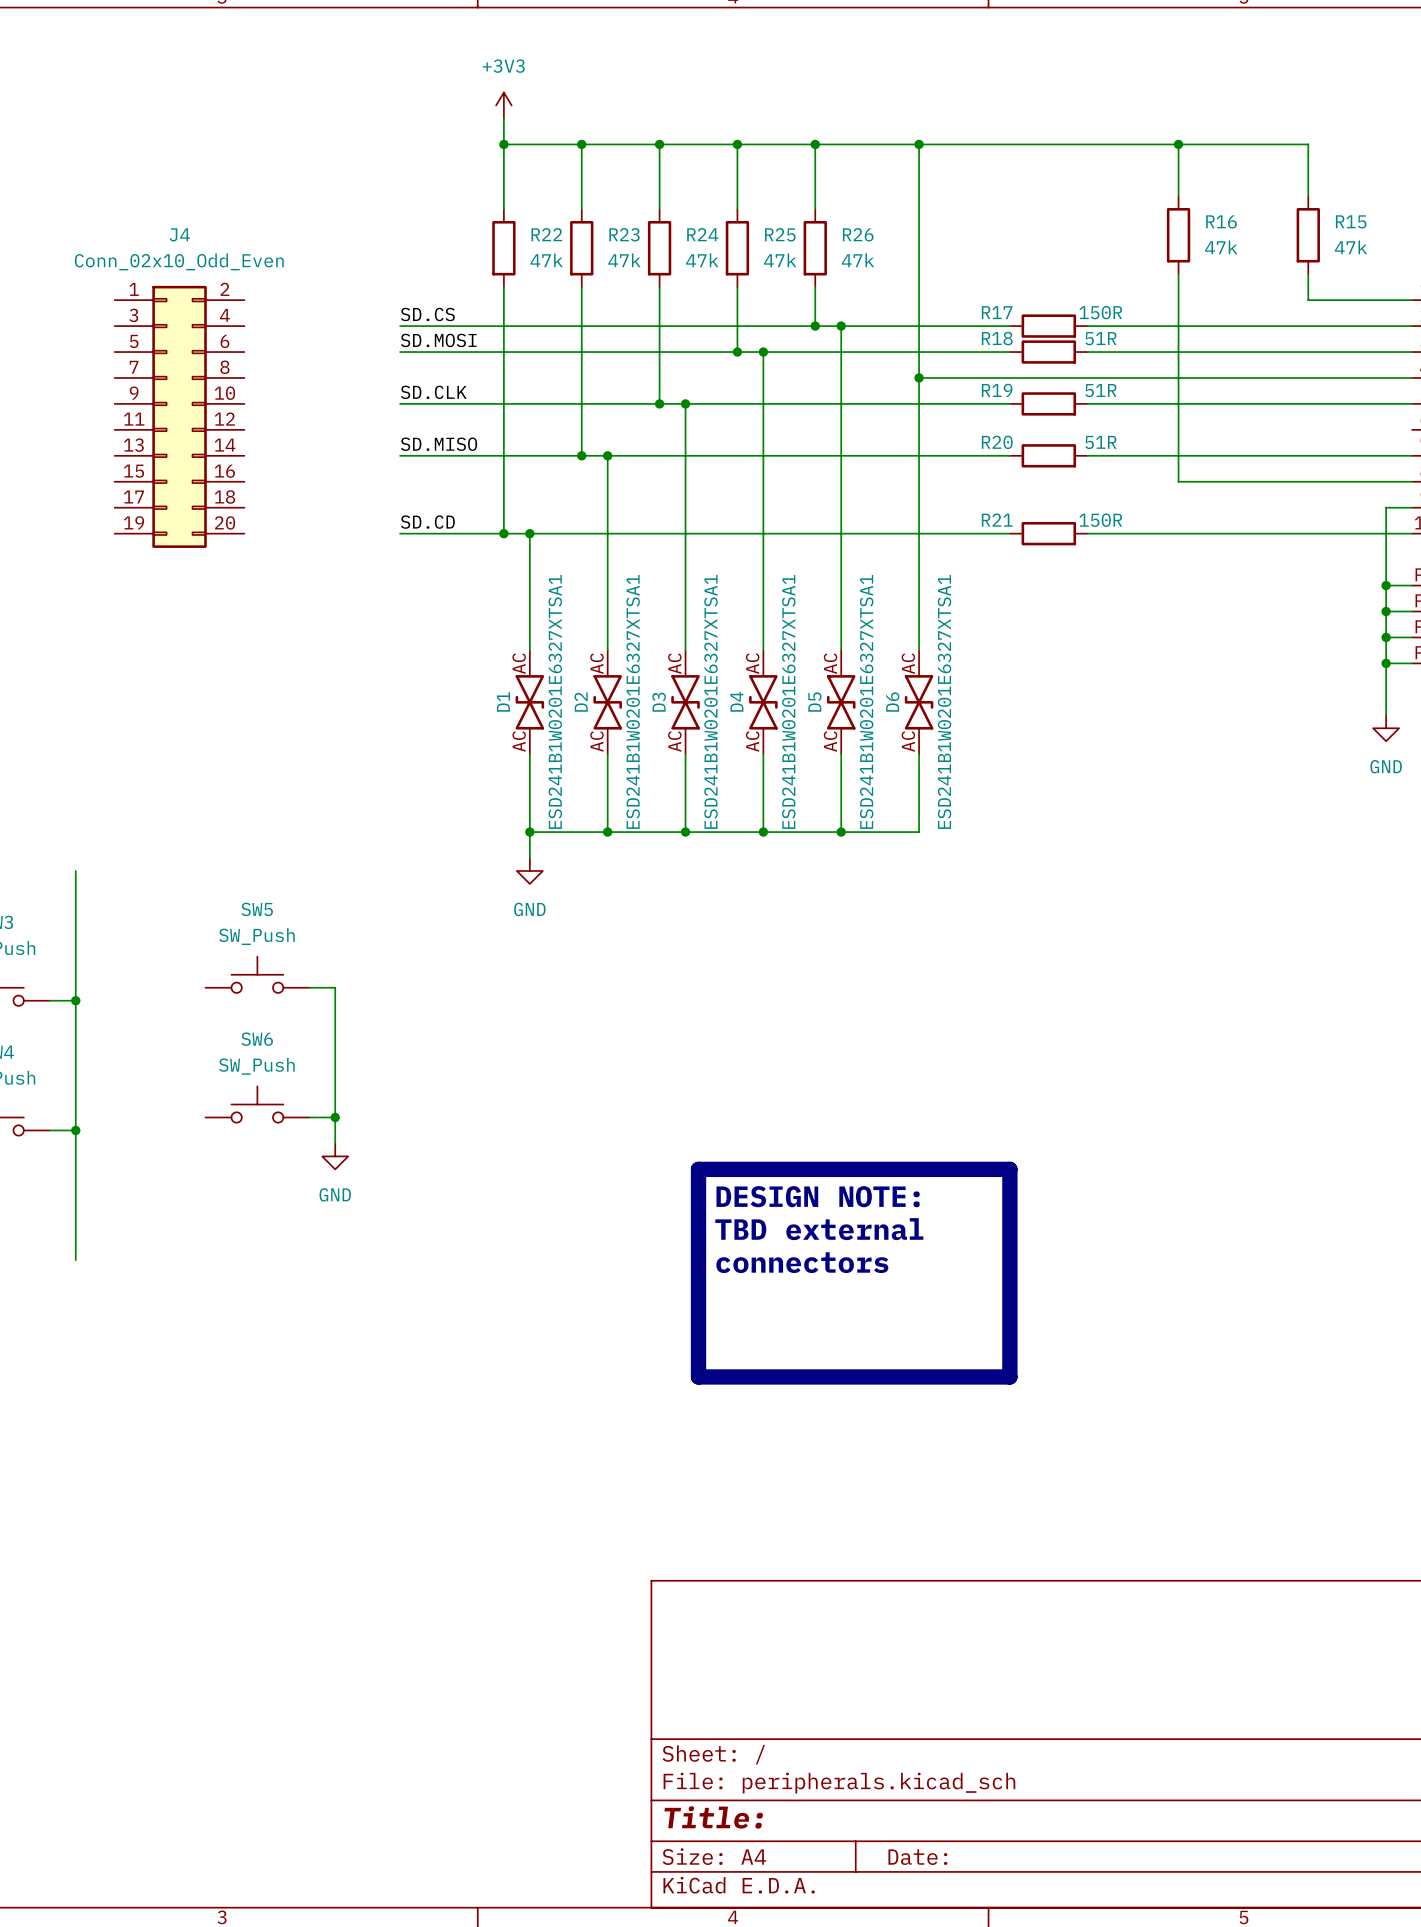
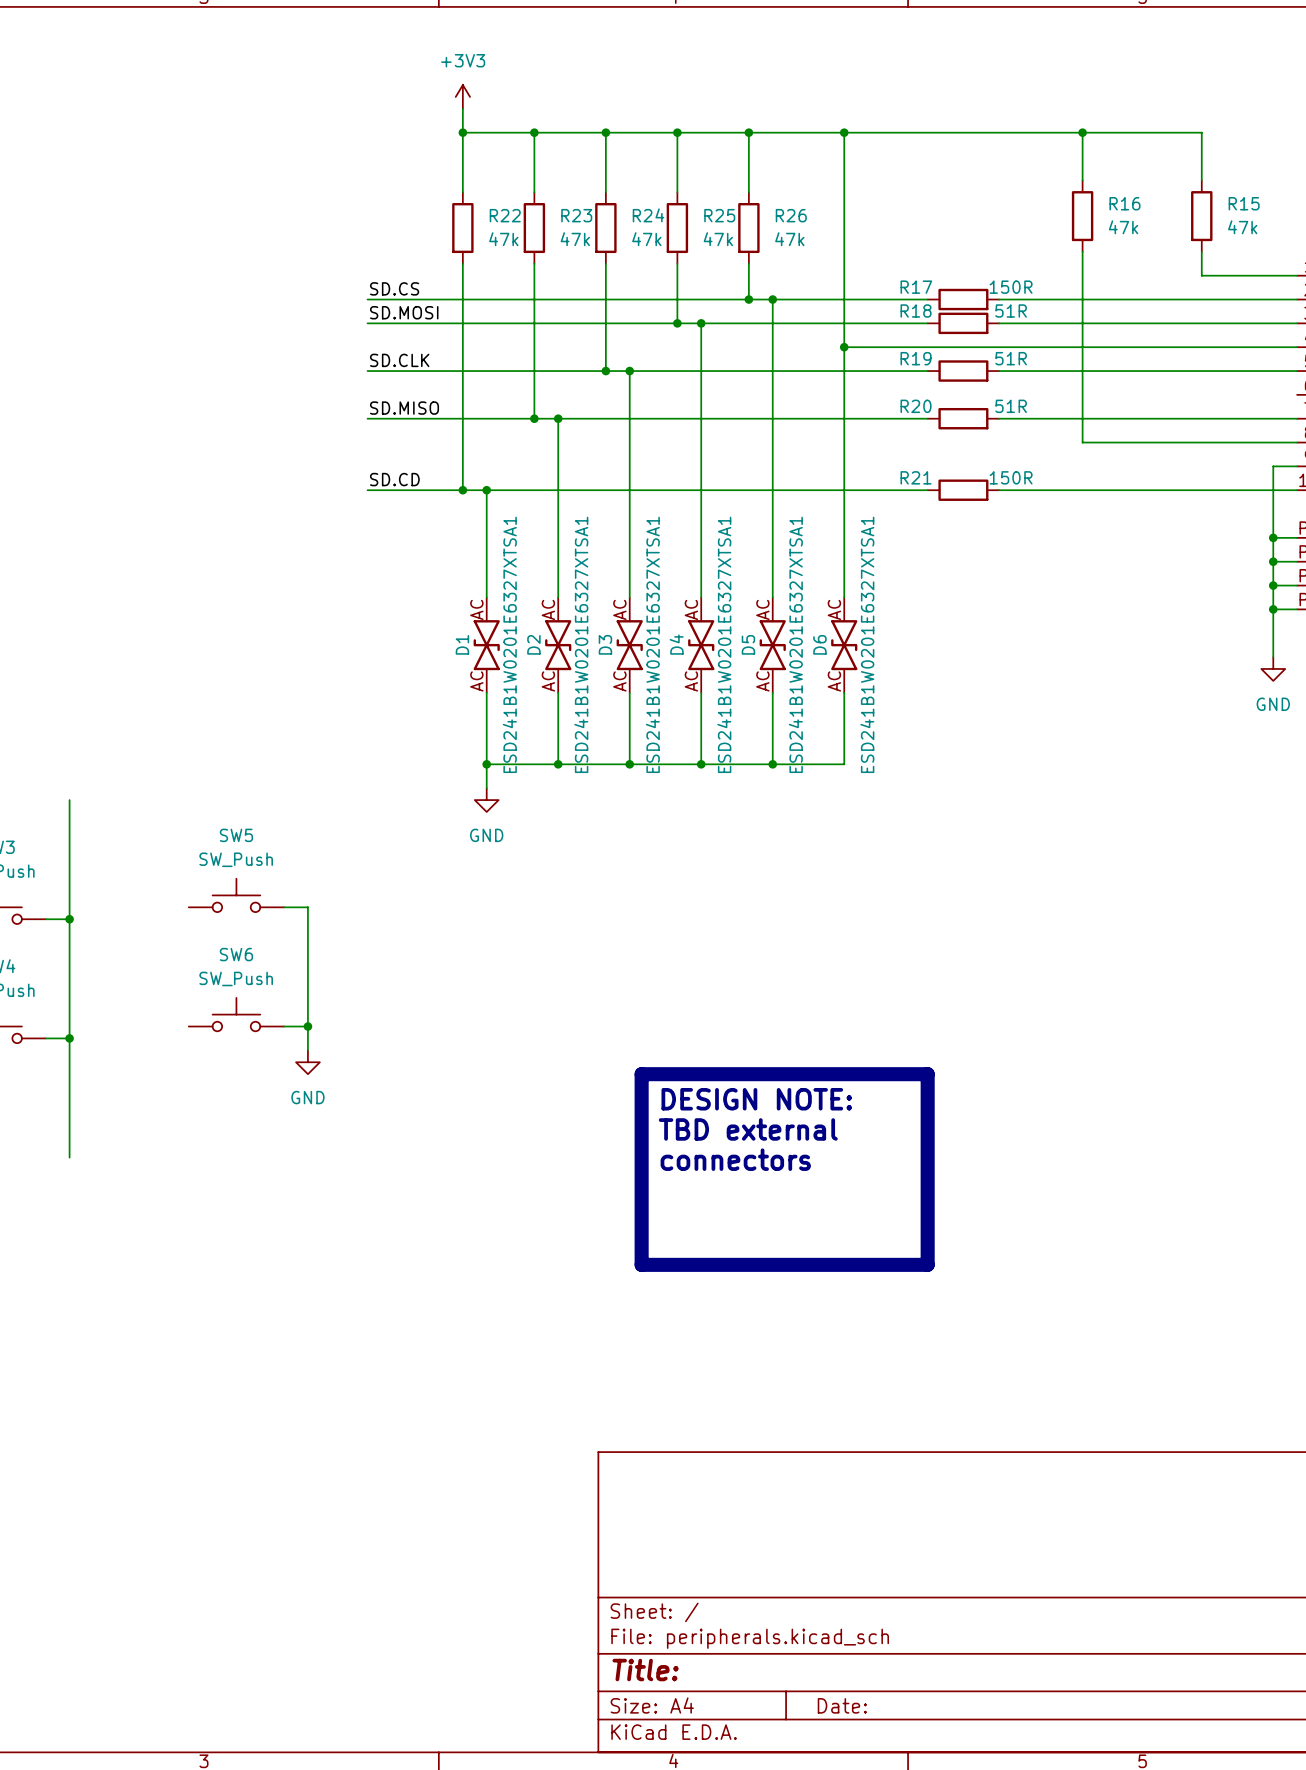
J4: Conn_02x10_Odd_Even (179, 416) -> none

